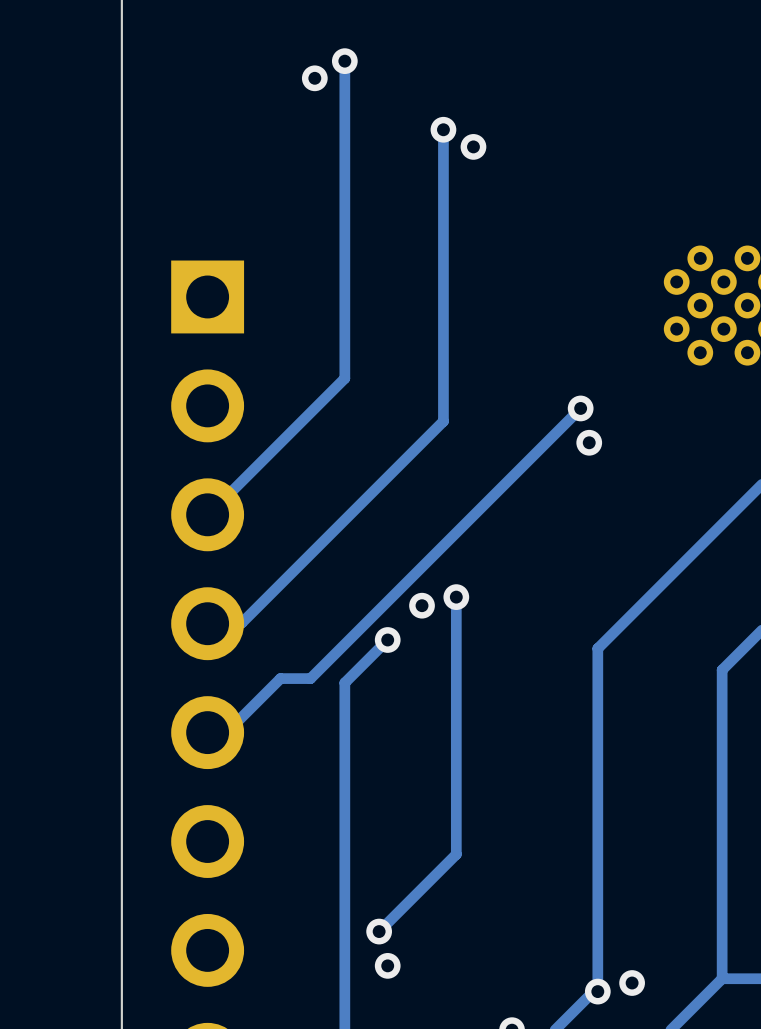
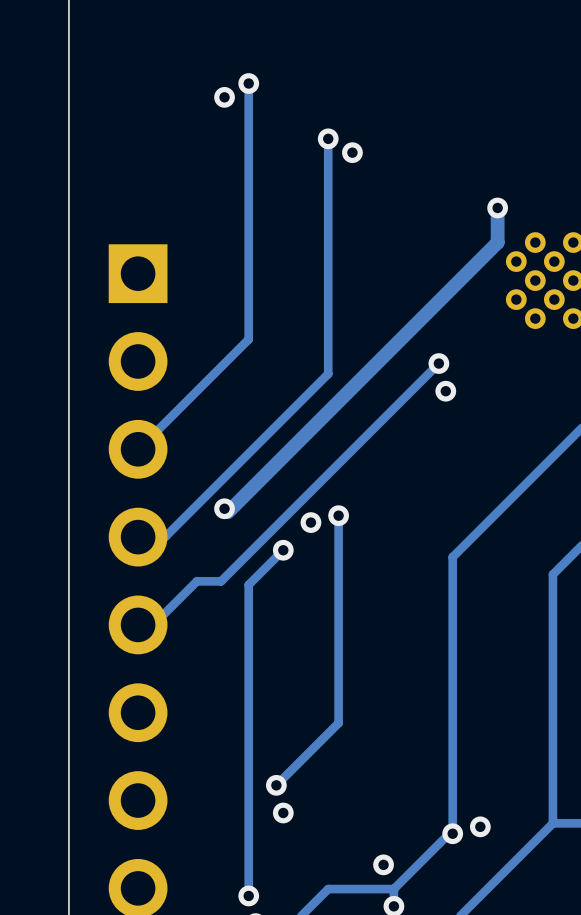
track: none -> (497, 207) (497, 242) (227, 512)
via: none -> (497, 207)
via: none -> (224, 508)

